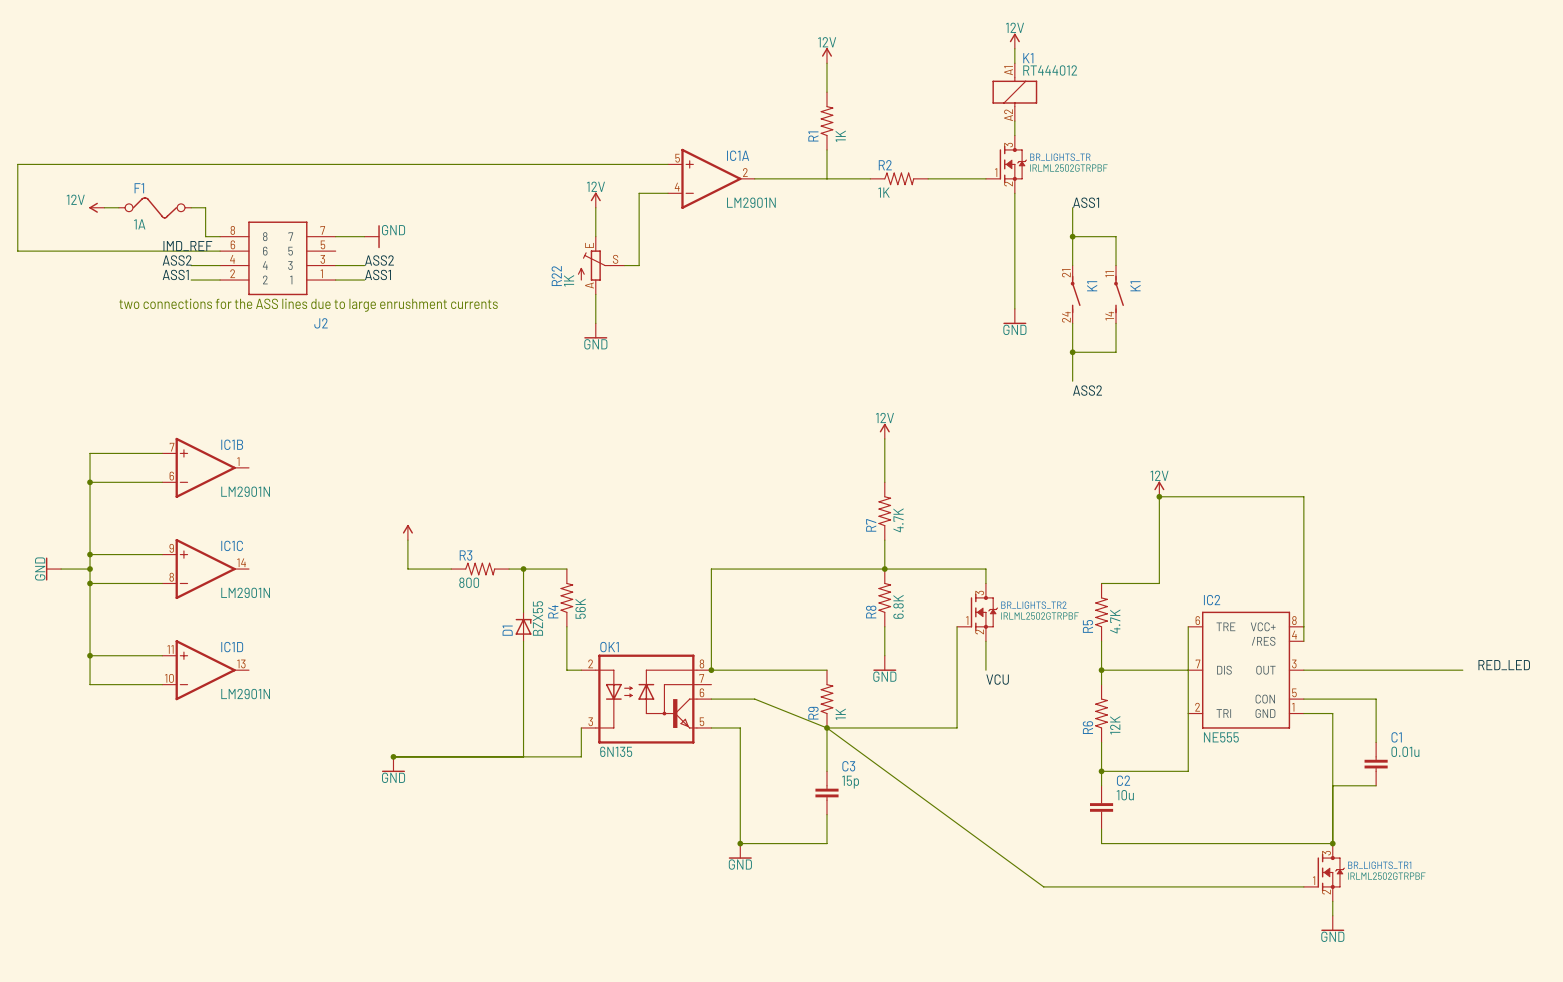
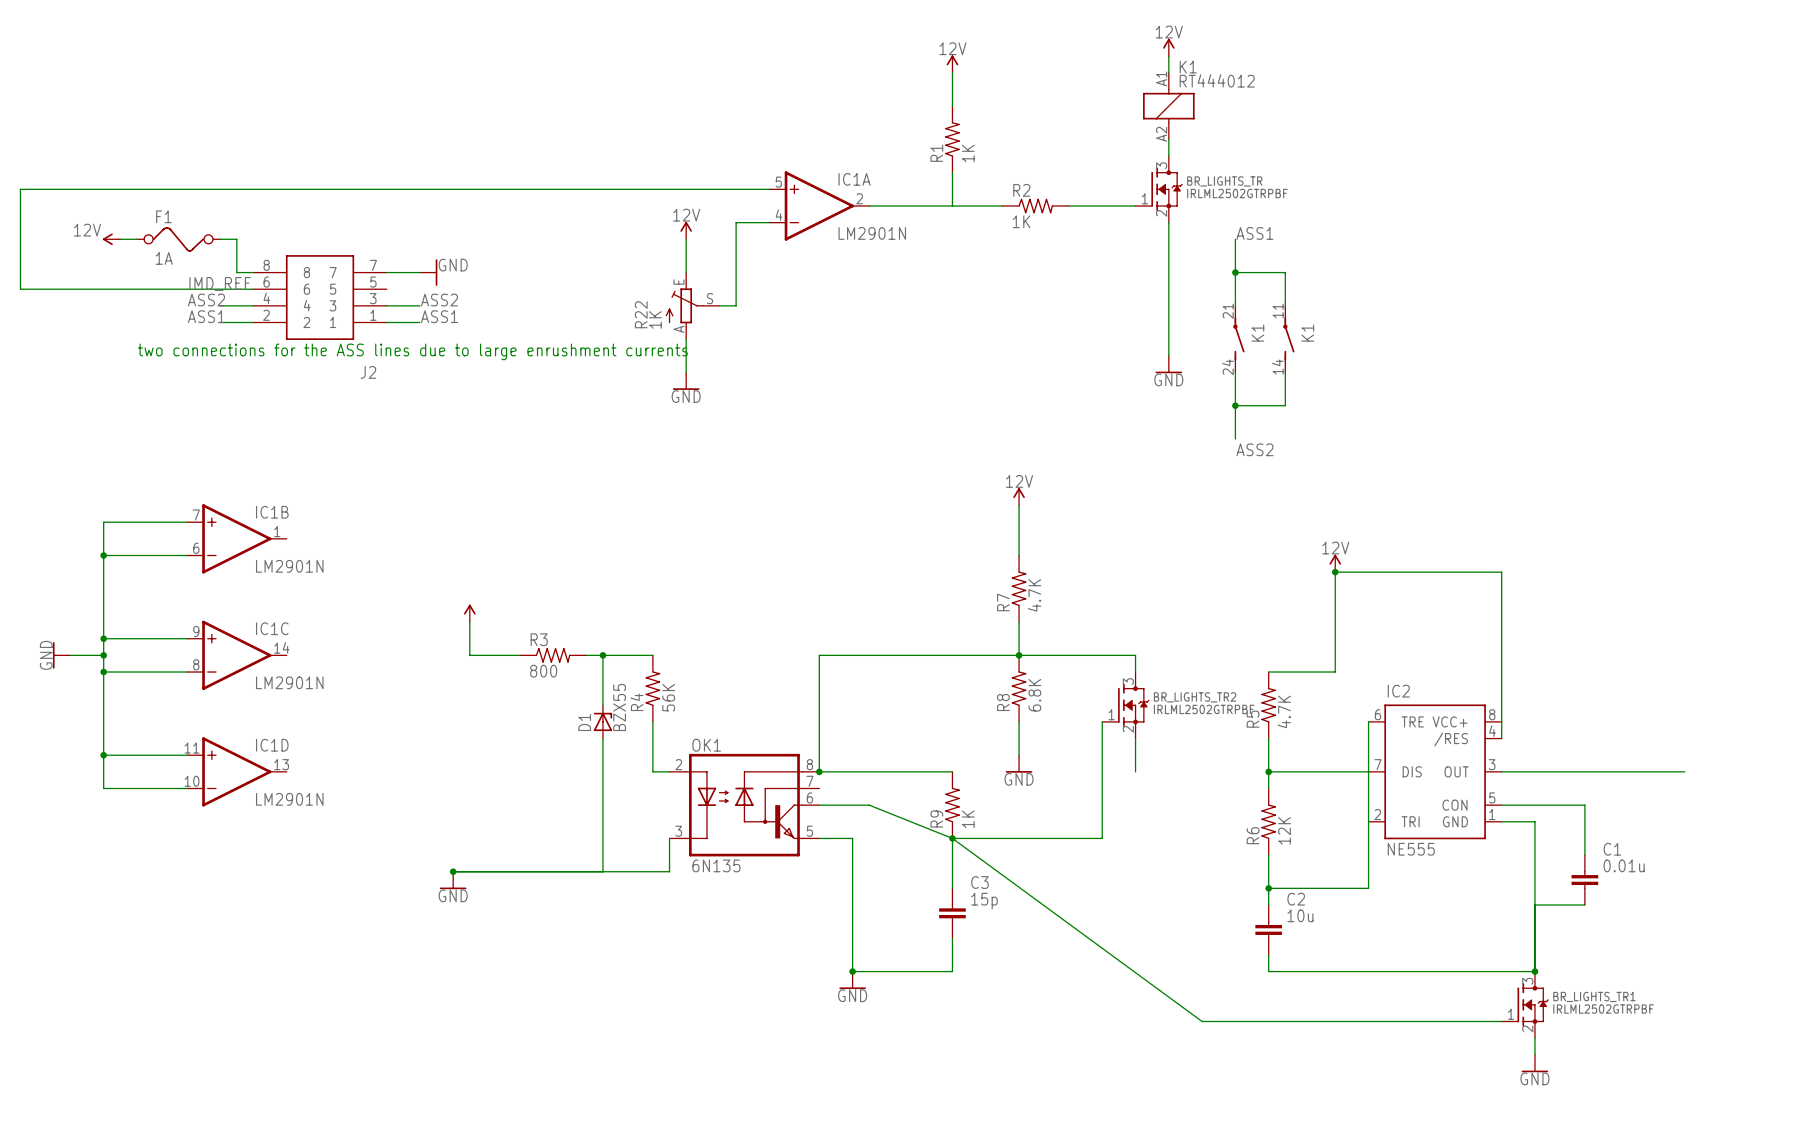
label: RED_LED (1504, 665) -> none
label: VCU (997, 679) -> none

